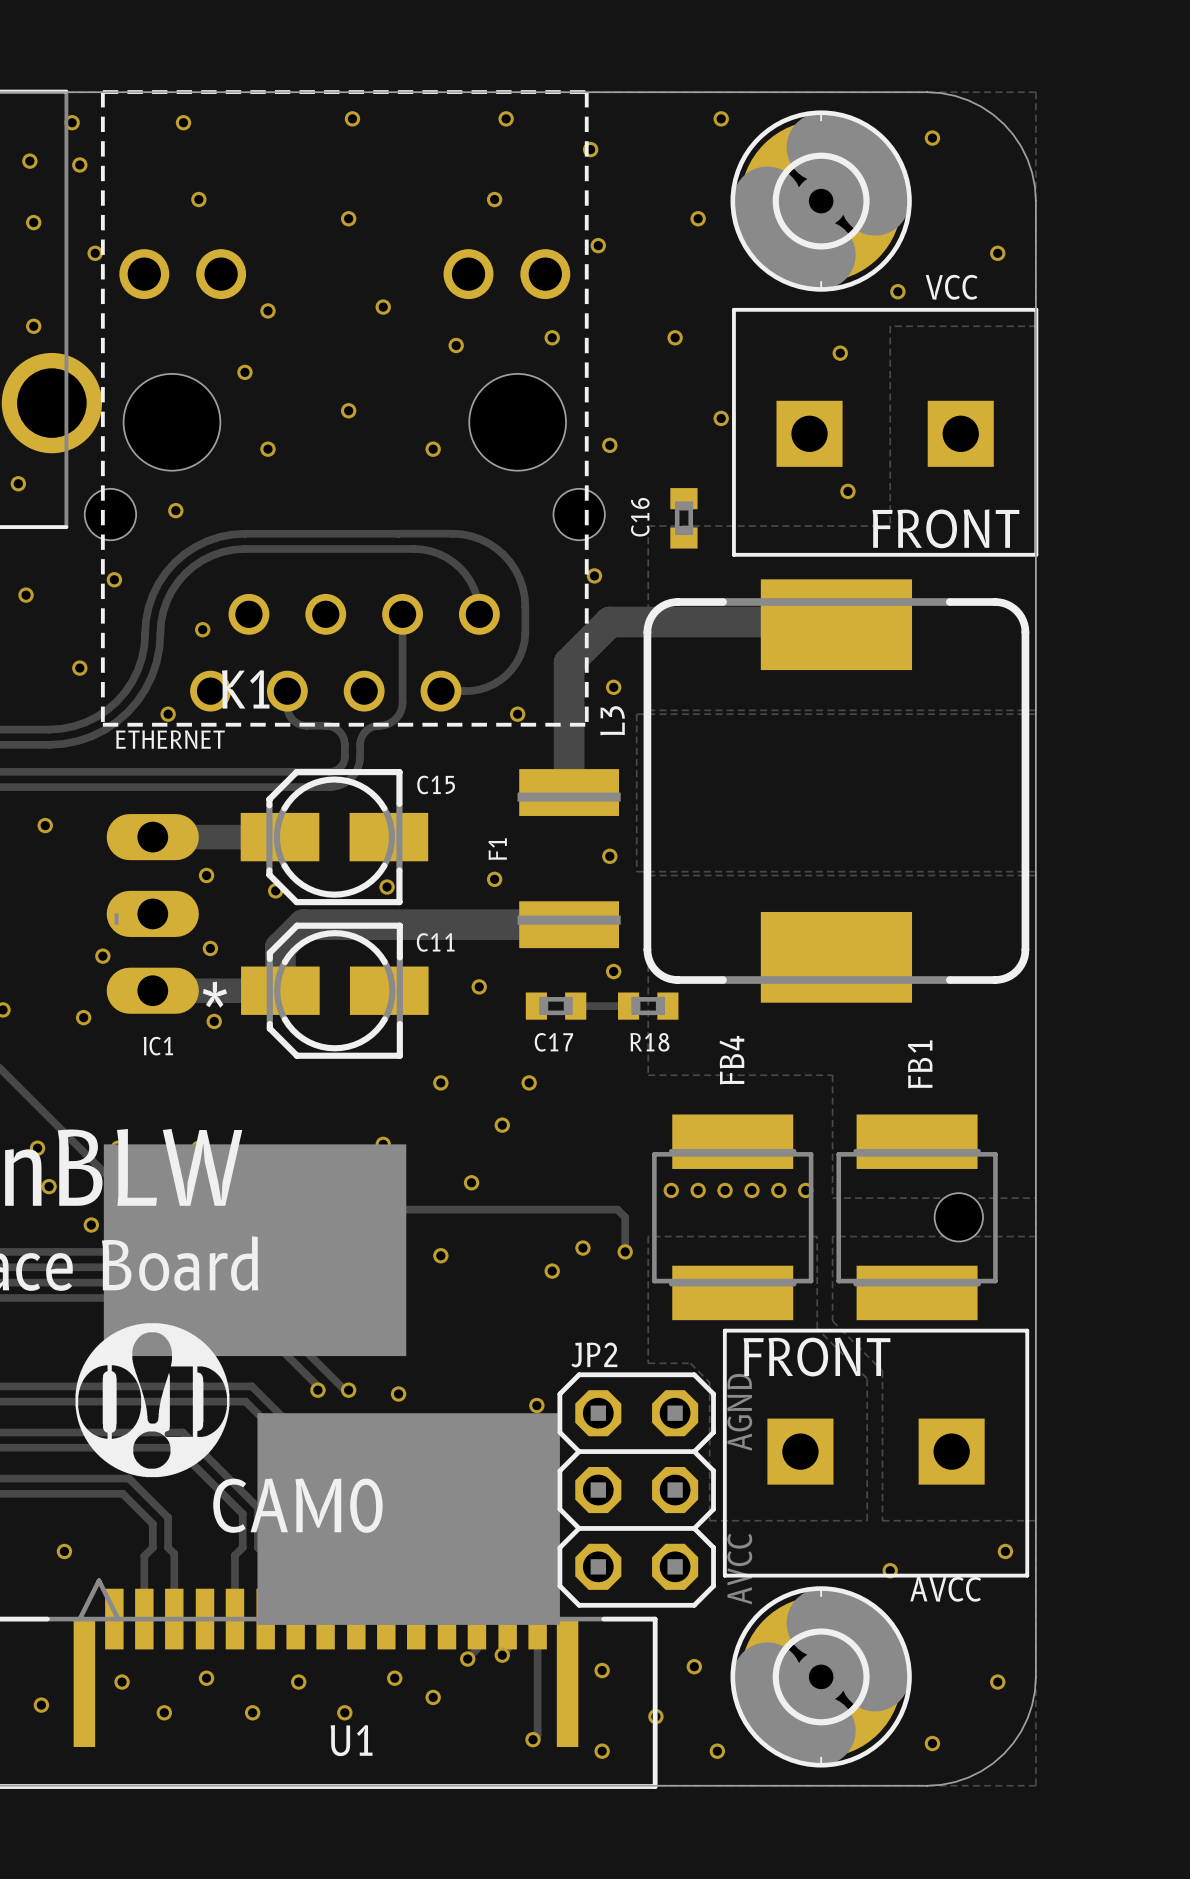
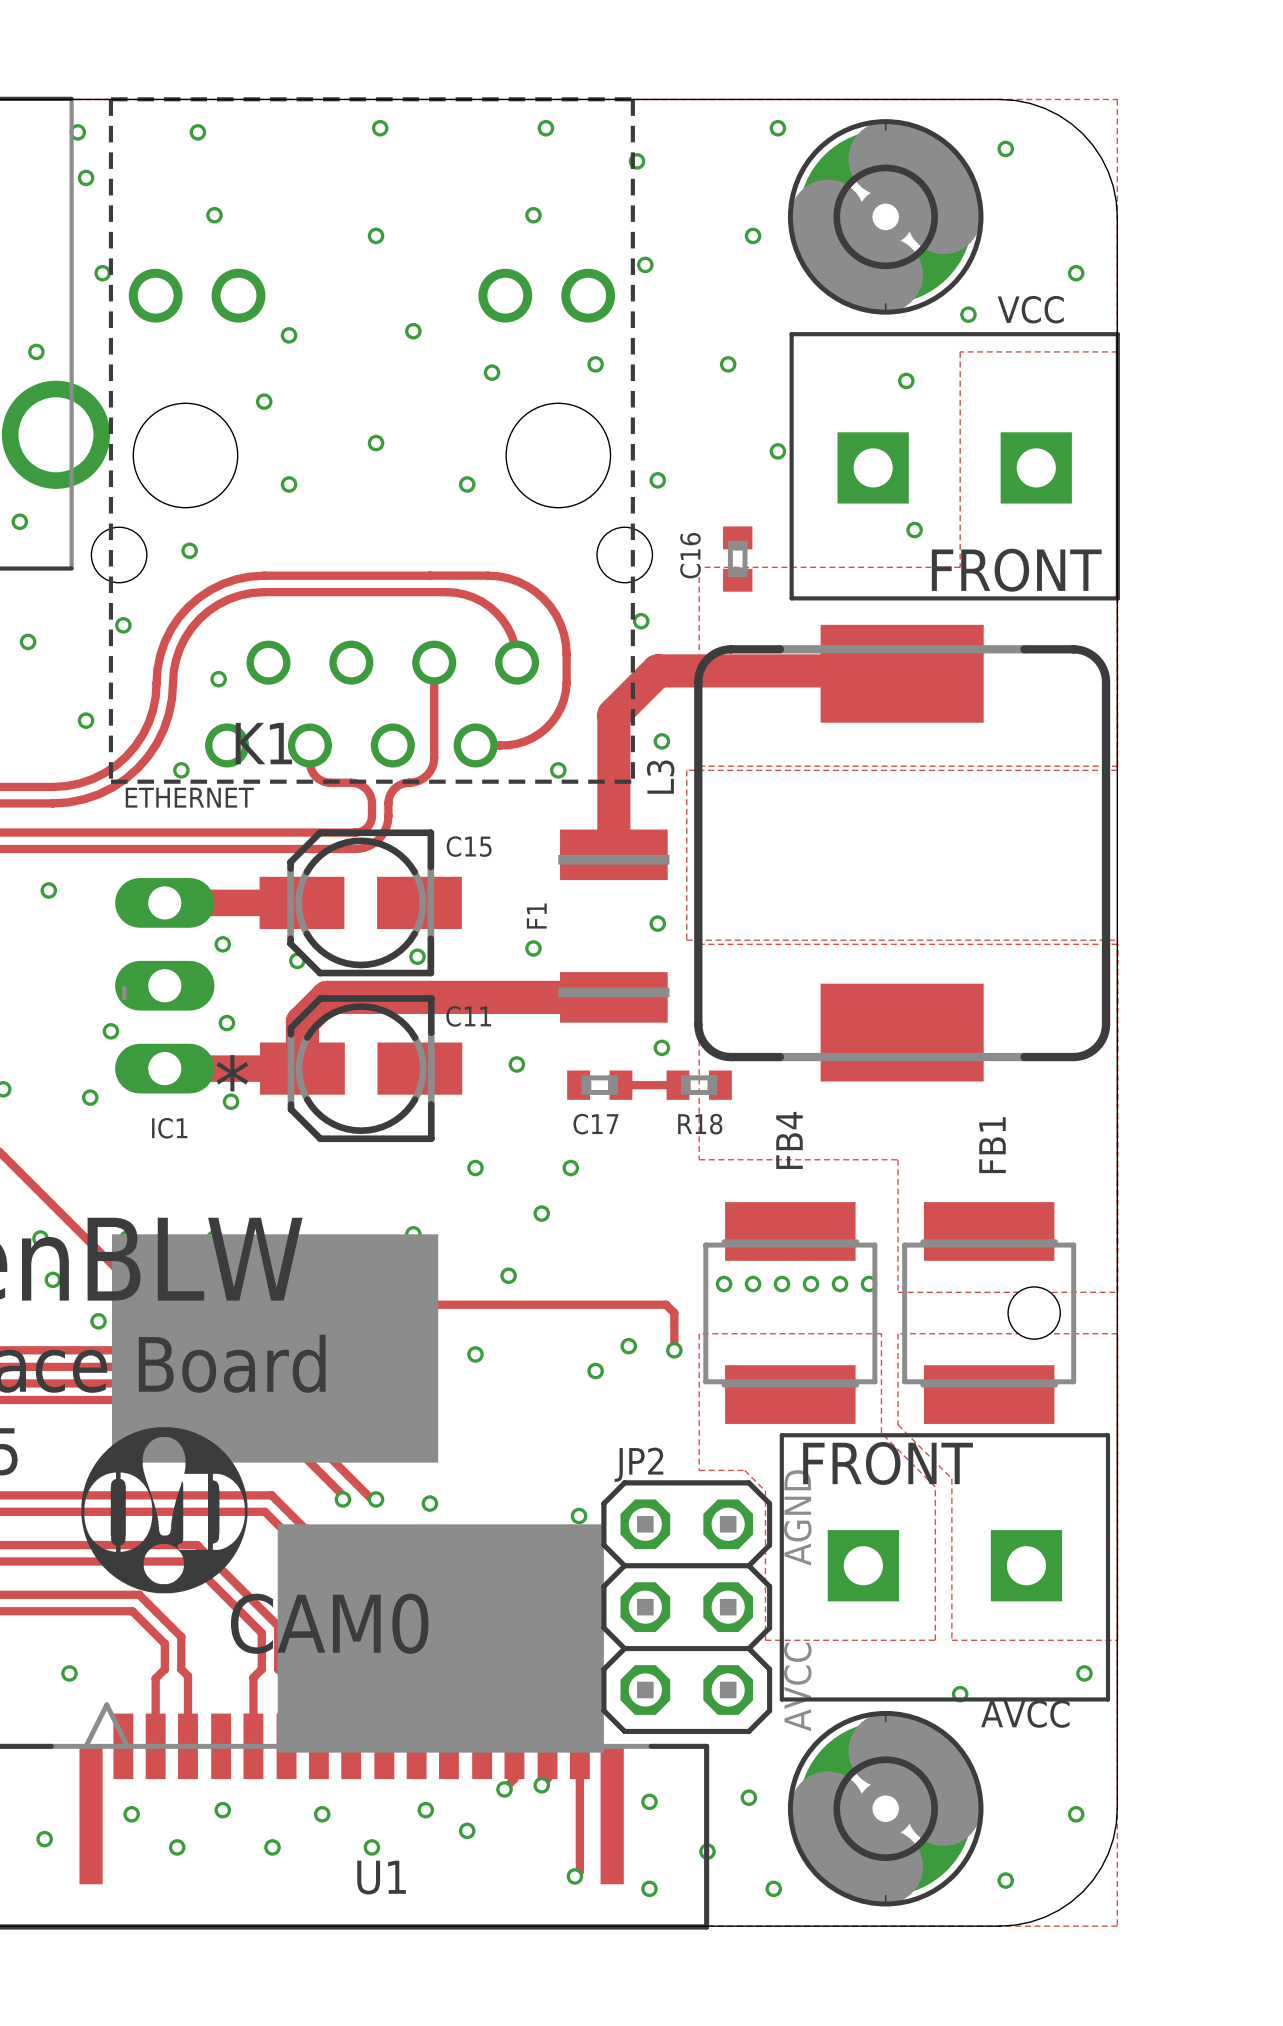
via: (29, 161) -> none
via: (33, 222) -> none

